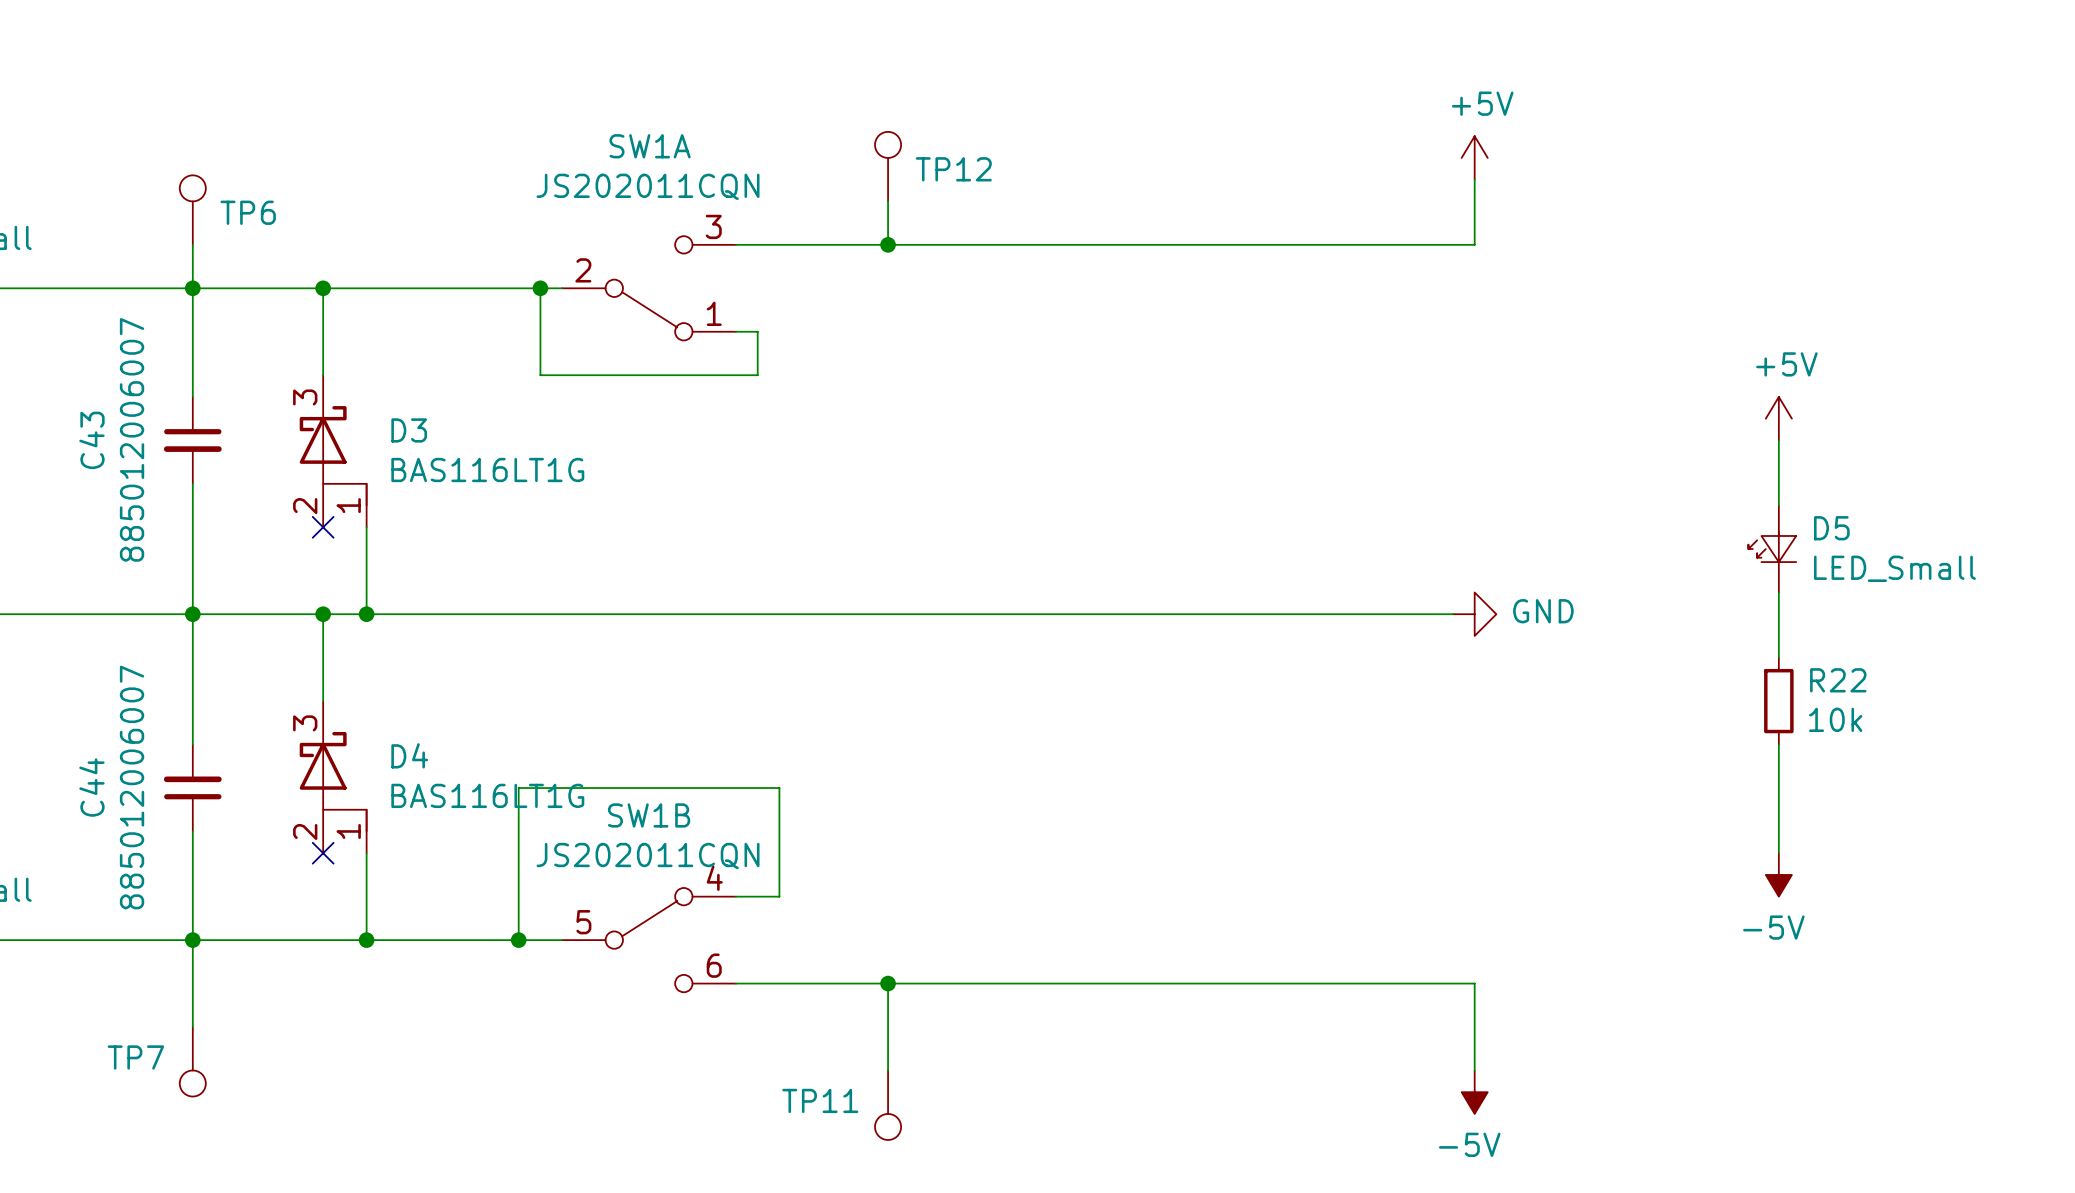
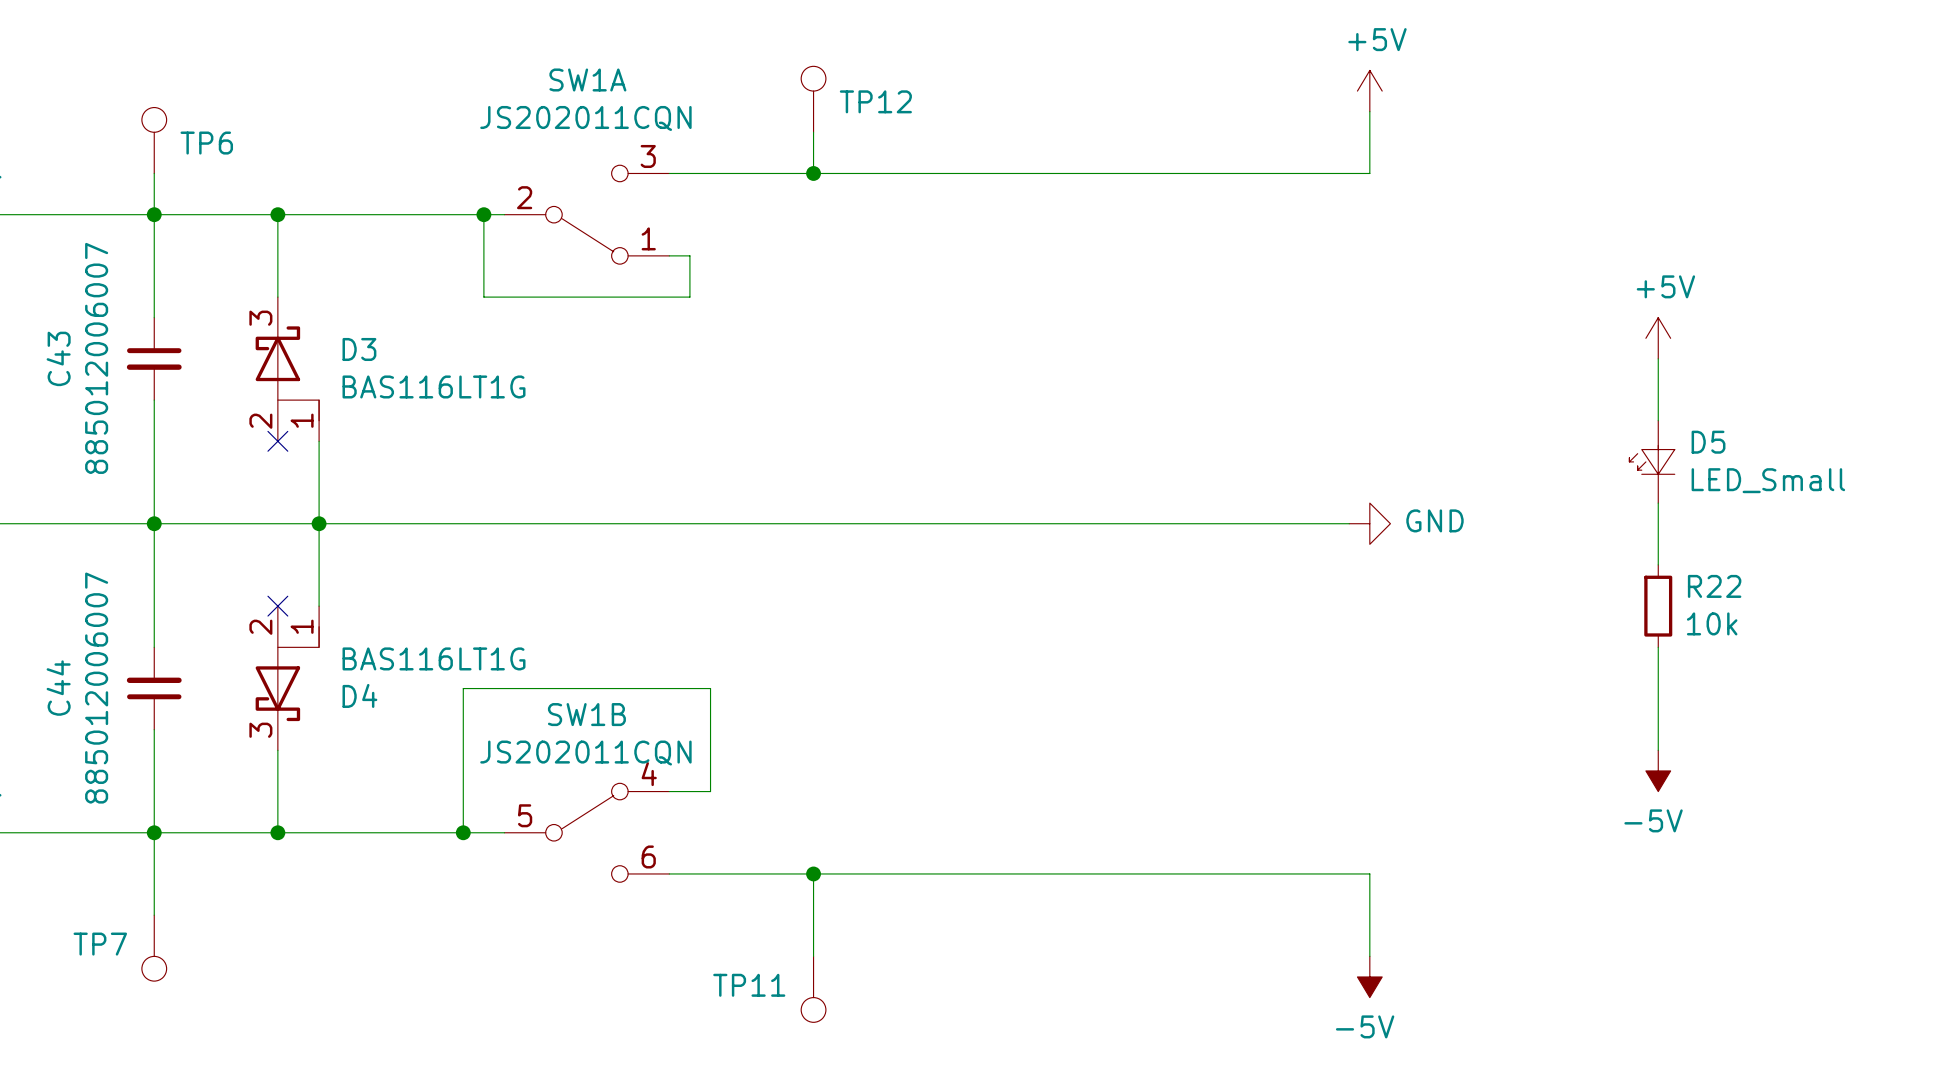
wire: (323, 614) (323, 701) -> (319, 523) (319, 606)
junction: (323, 614) -> none
no-connect mark: none -> (277, 606)
D4 flip: as is (333, 781) -> up-down (287, 673)
no-connect mark: (323, 853) -> none
wire: (366, 853) (366, 940) -> (277, 750) (277, 832)
junction position: (366, 940) -> (277, 832)

